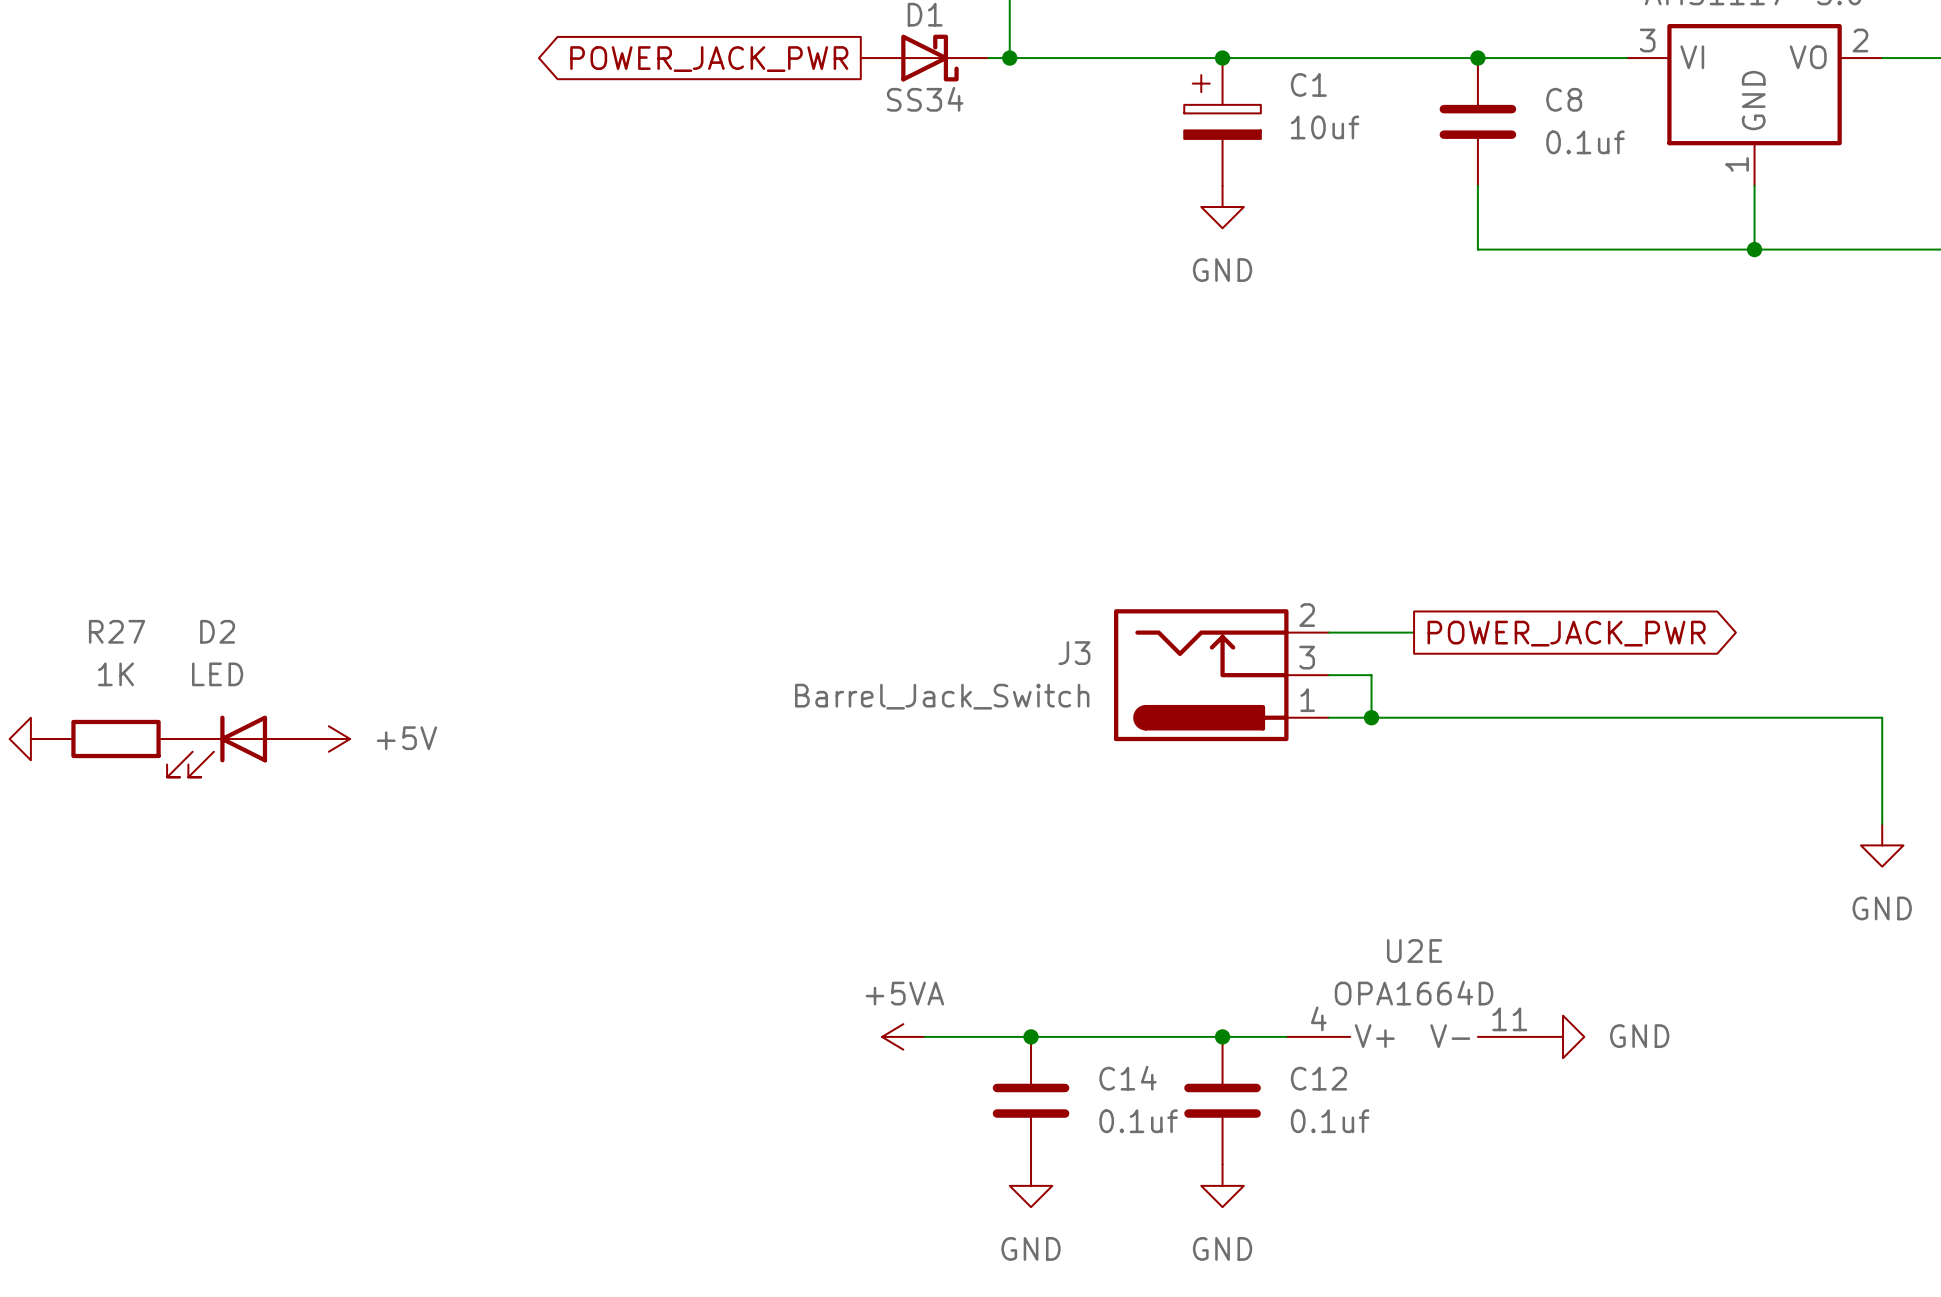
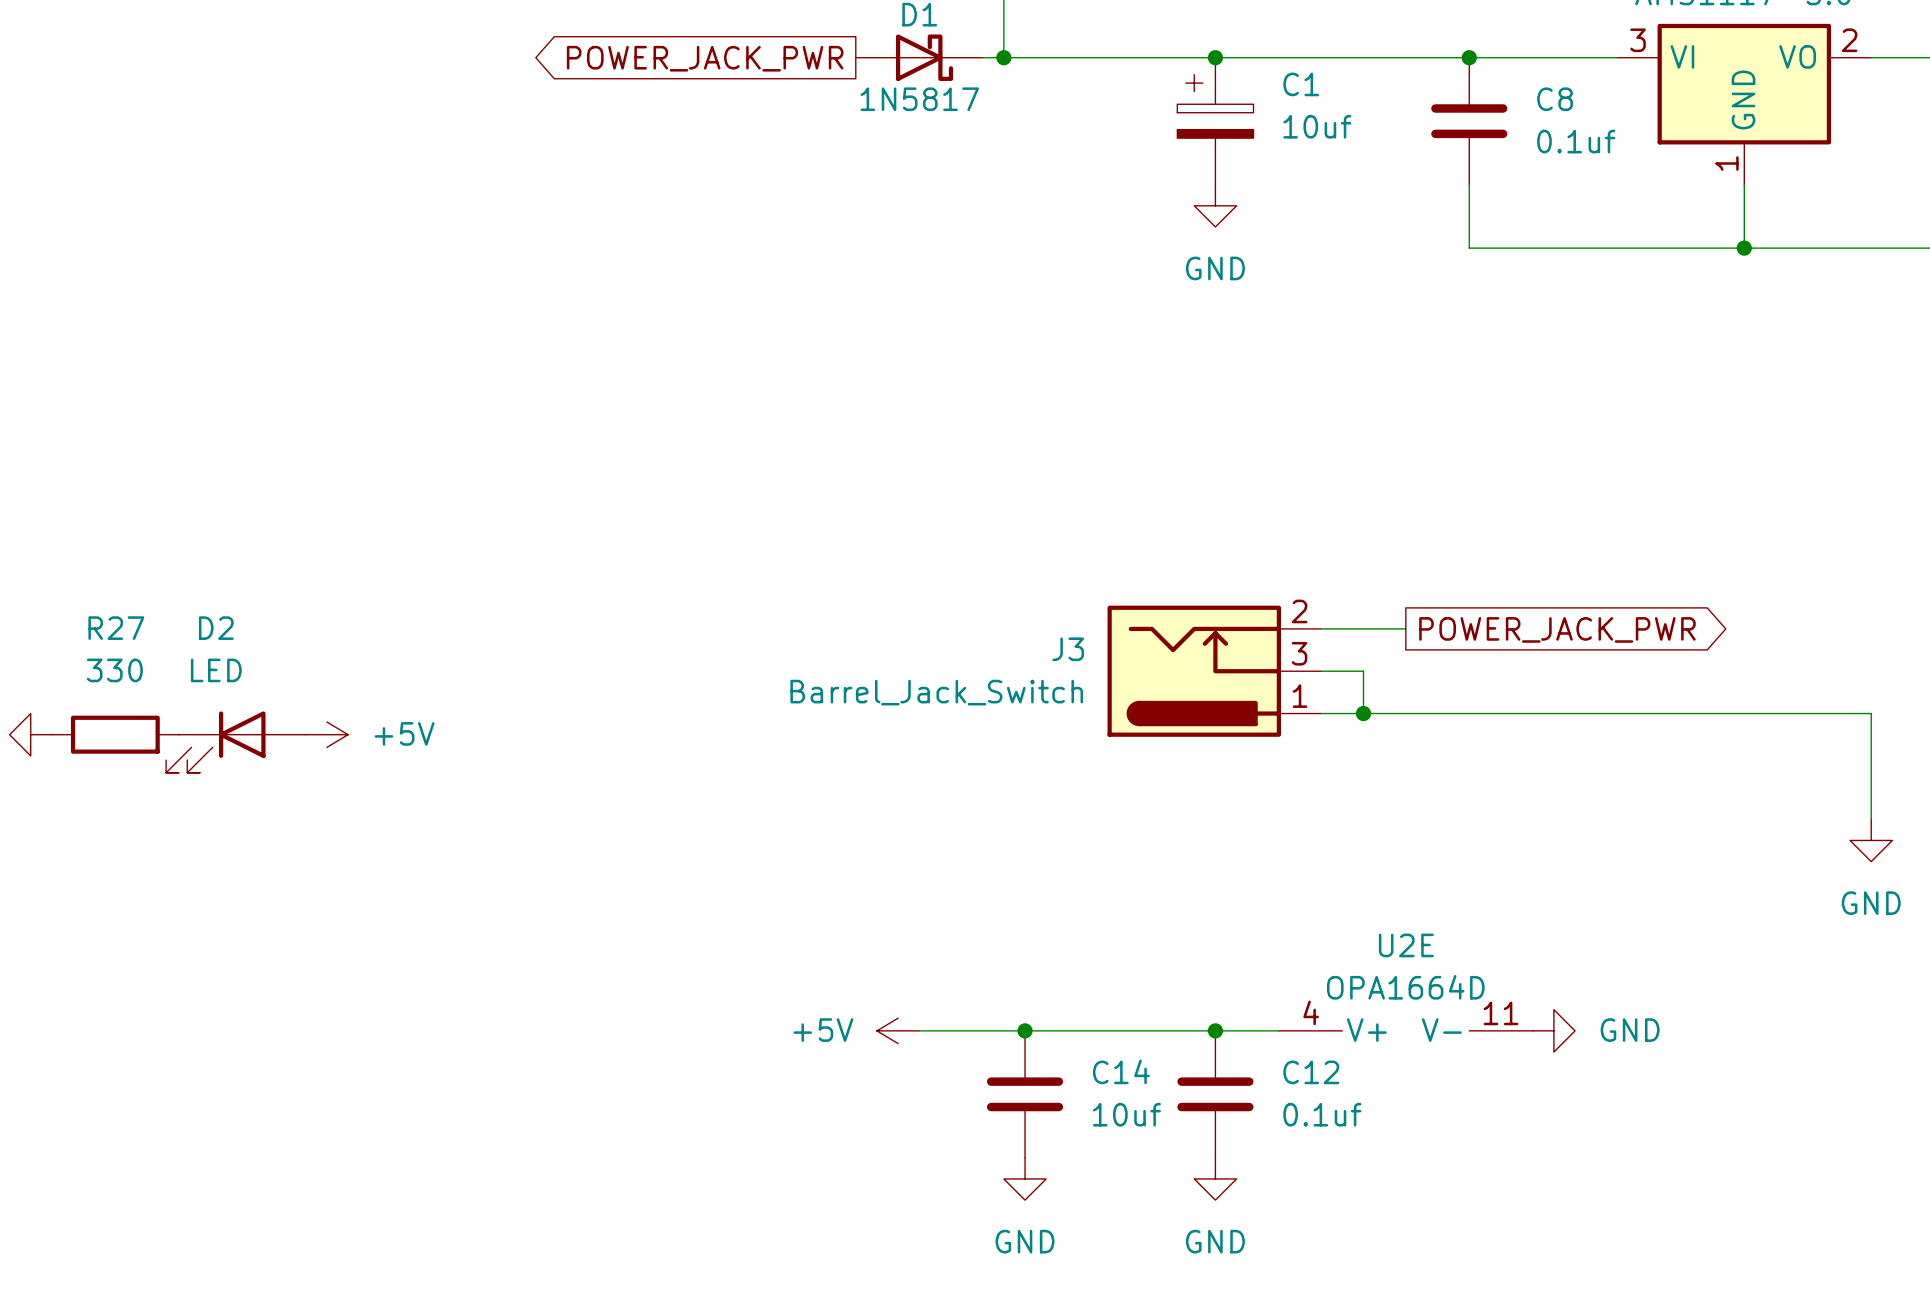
D1 value: SS34 (925, 99) -> 1N5817 (919, 99)
R27 value: 1K (116, 674) -> 330 (114, 670)
power symbol: +5VA (903, 1036) -> +5V (898, 1030)
C14 value: 0.1uf (1138, 1121) -> 10uf (1126, 1114)

